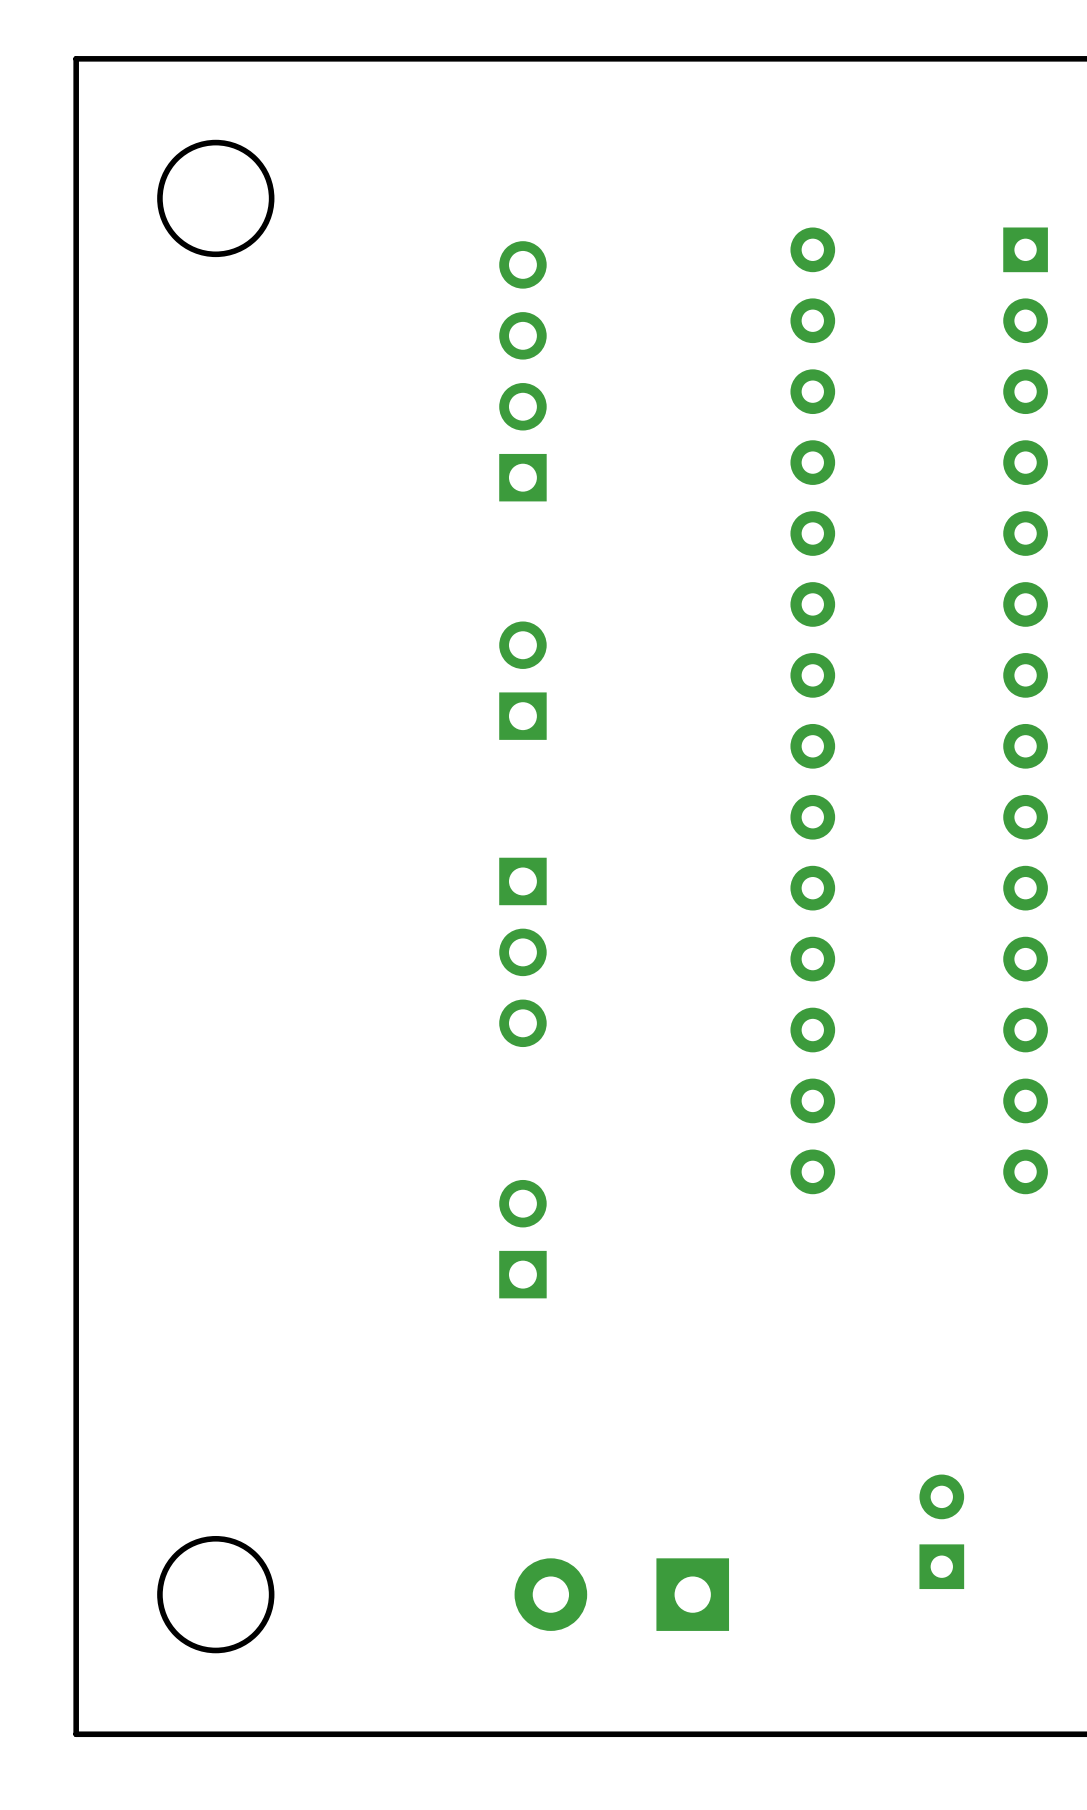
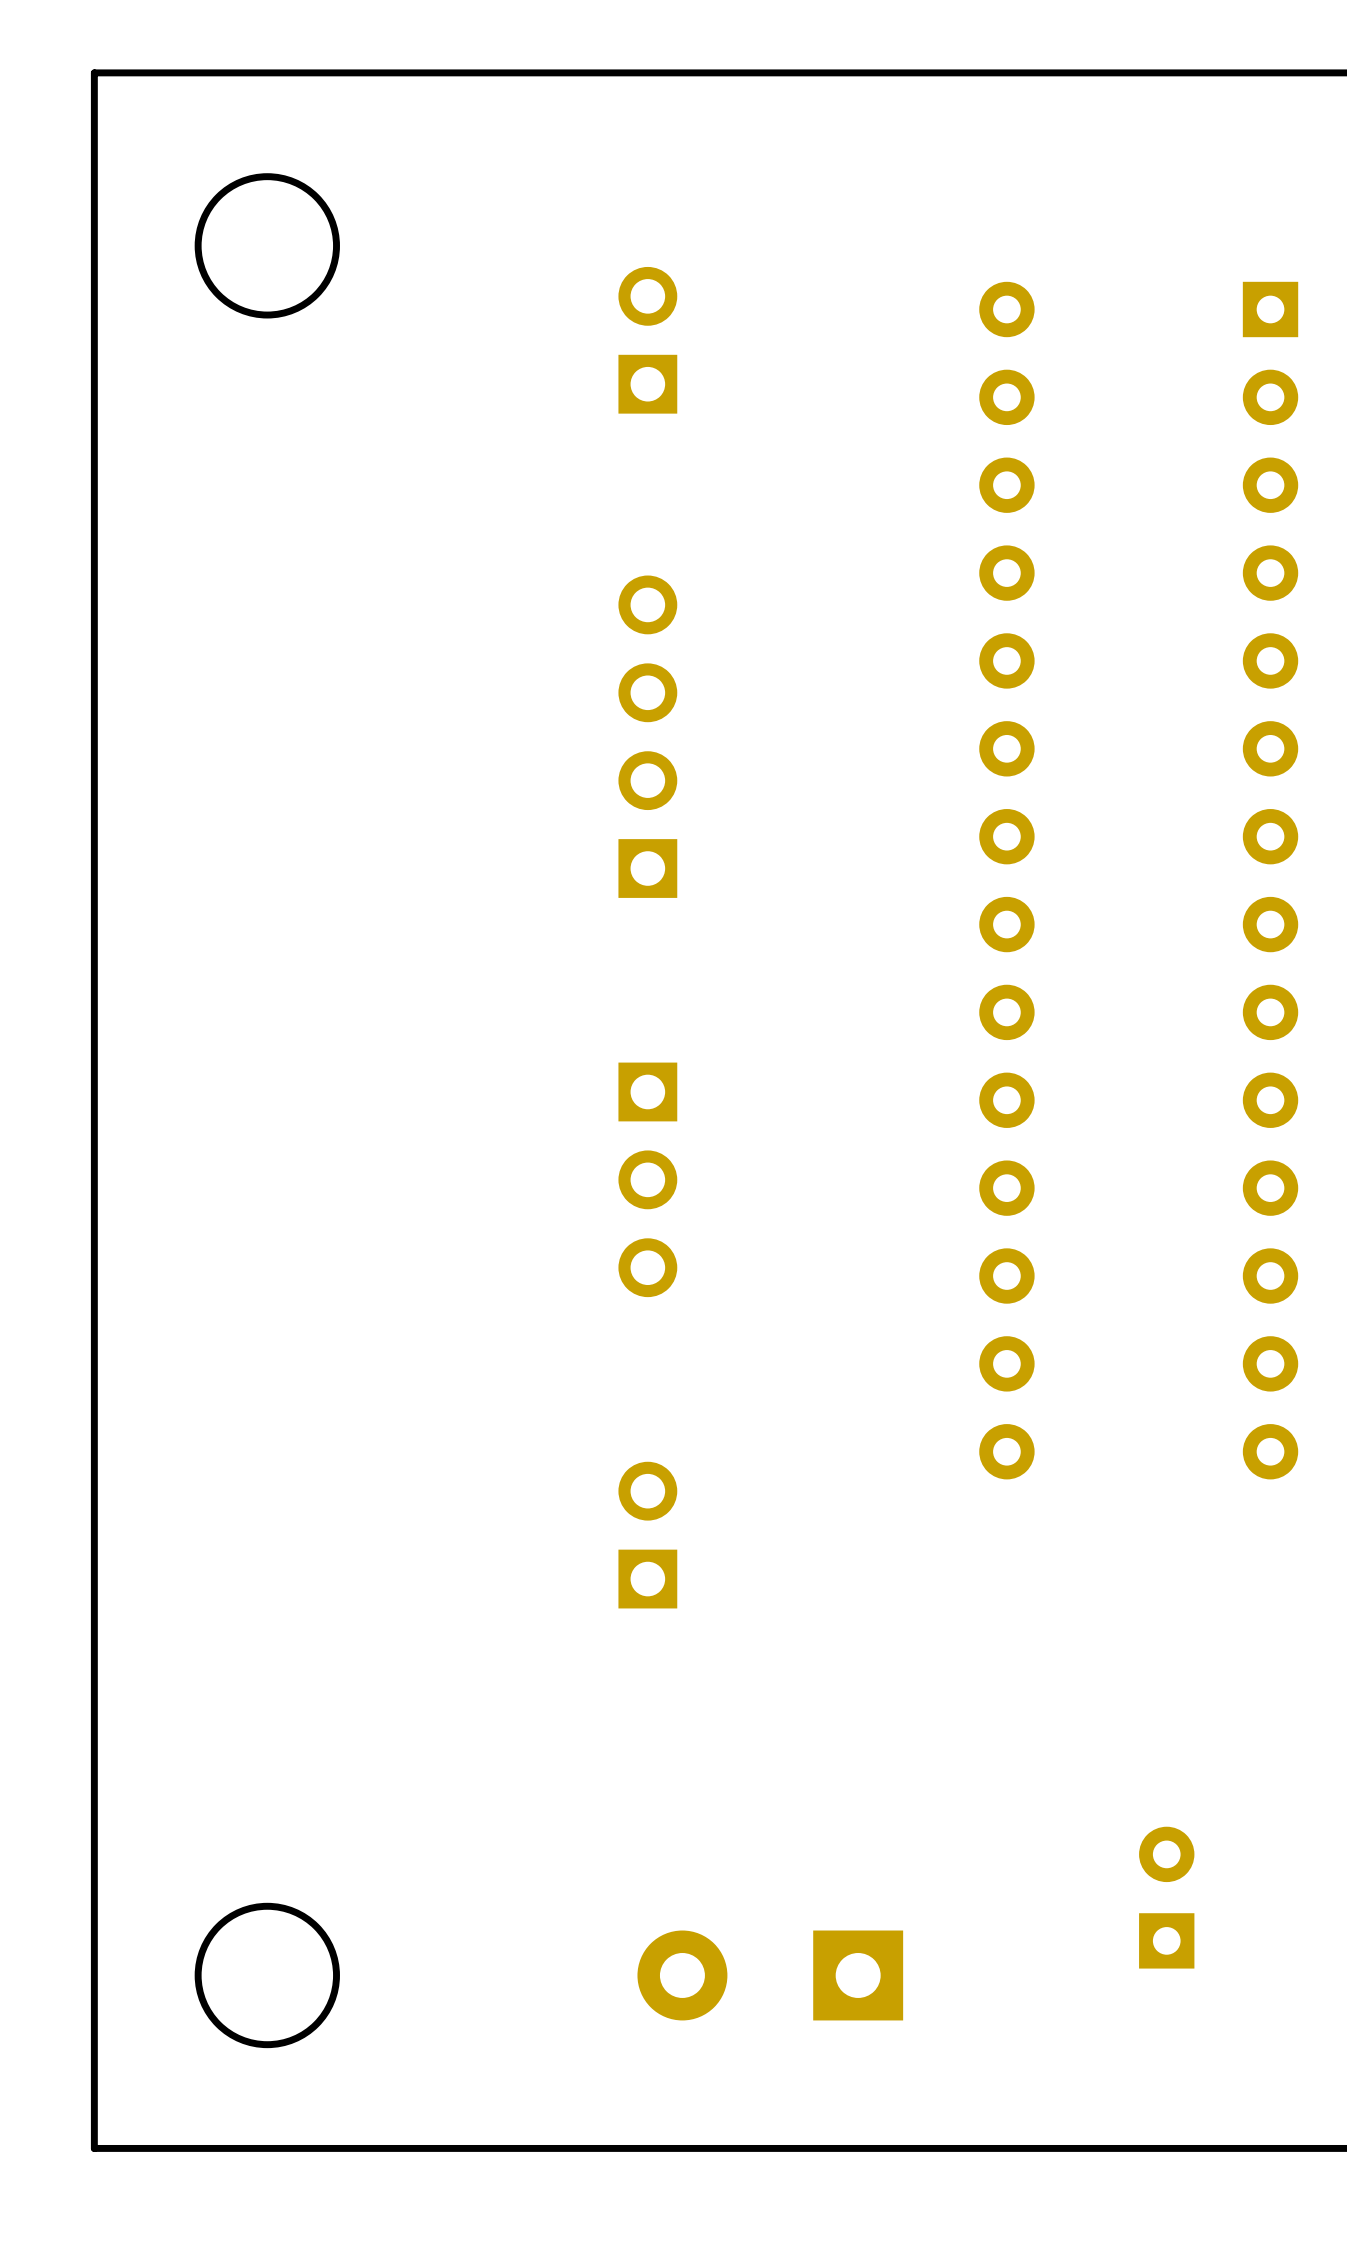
part position: (522, 371) -> (647, 736)
part position: (522, 680) -> (647, 340)

